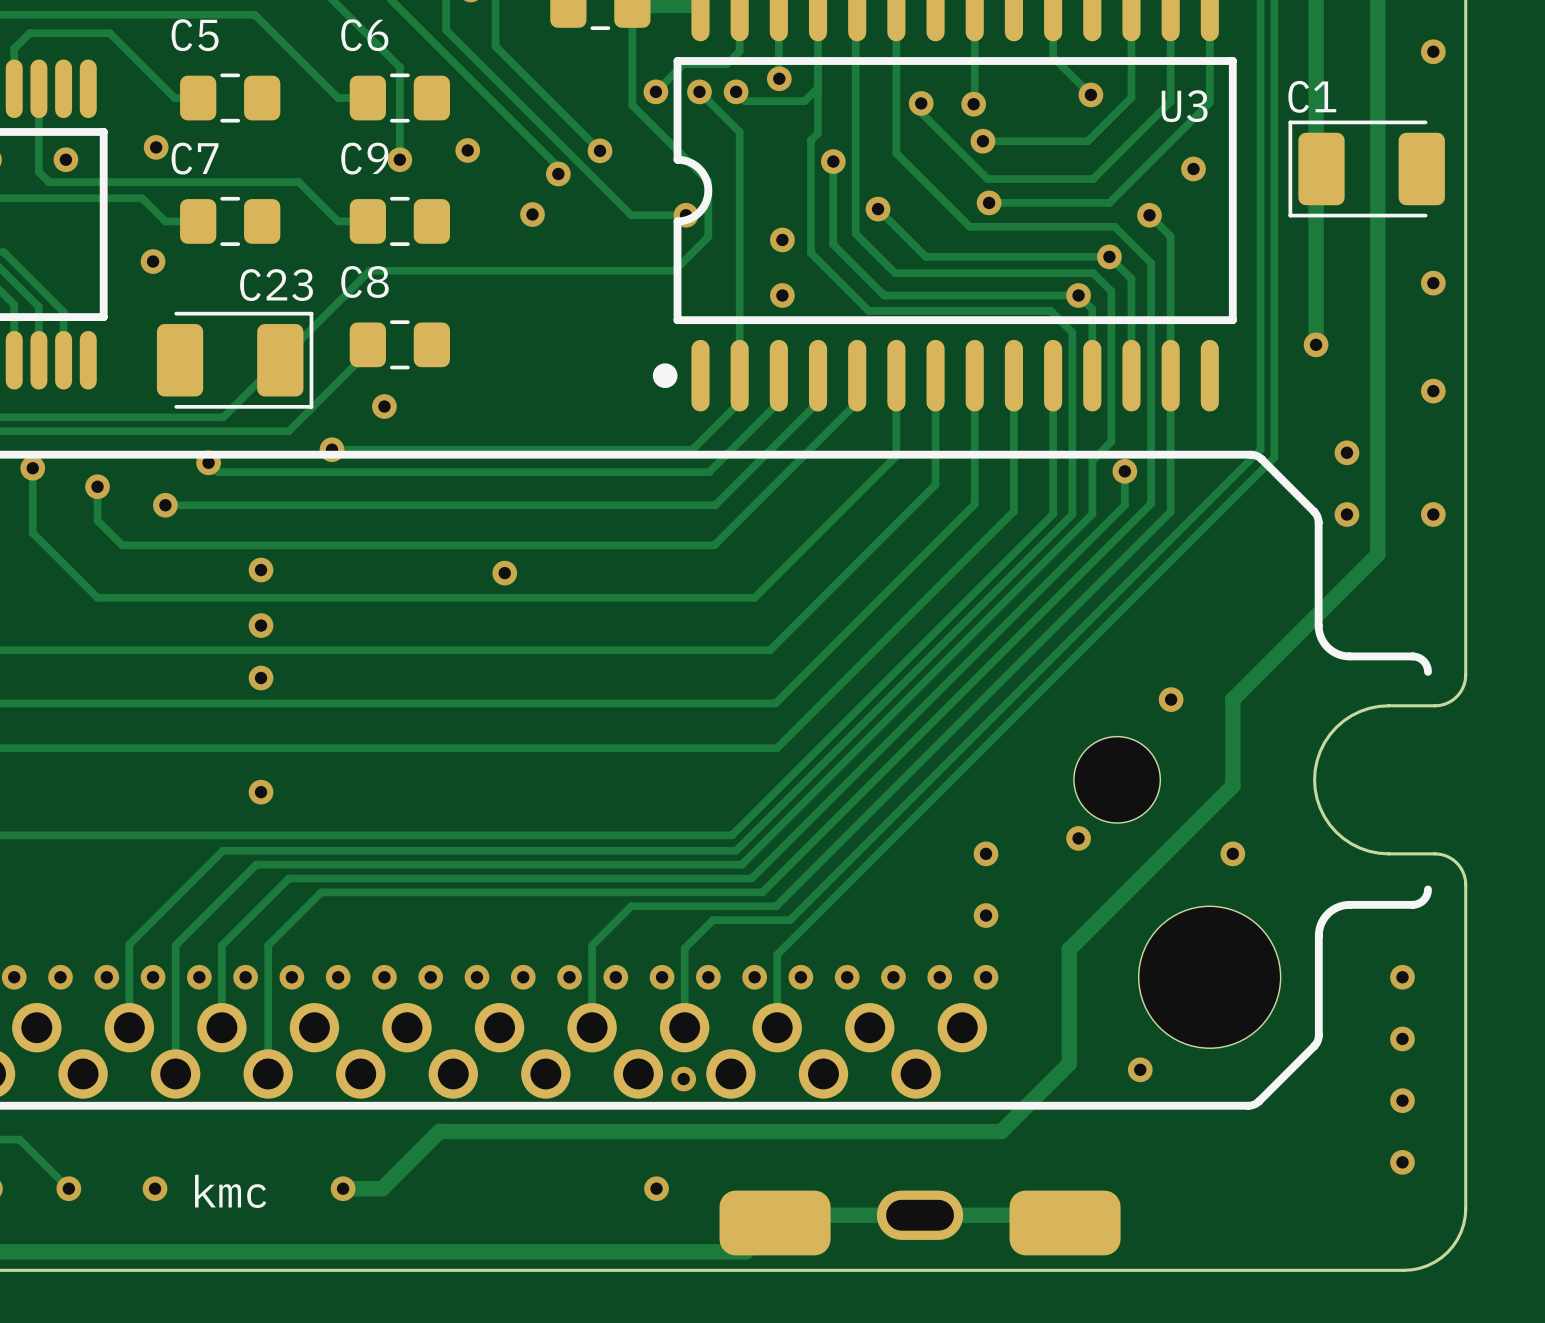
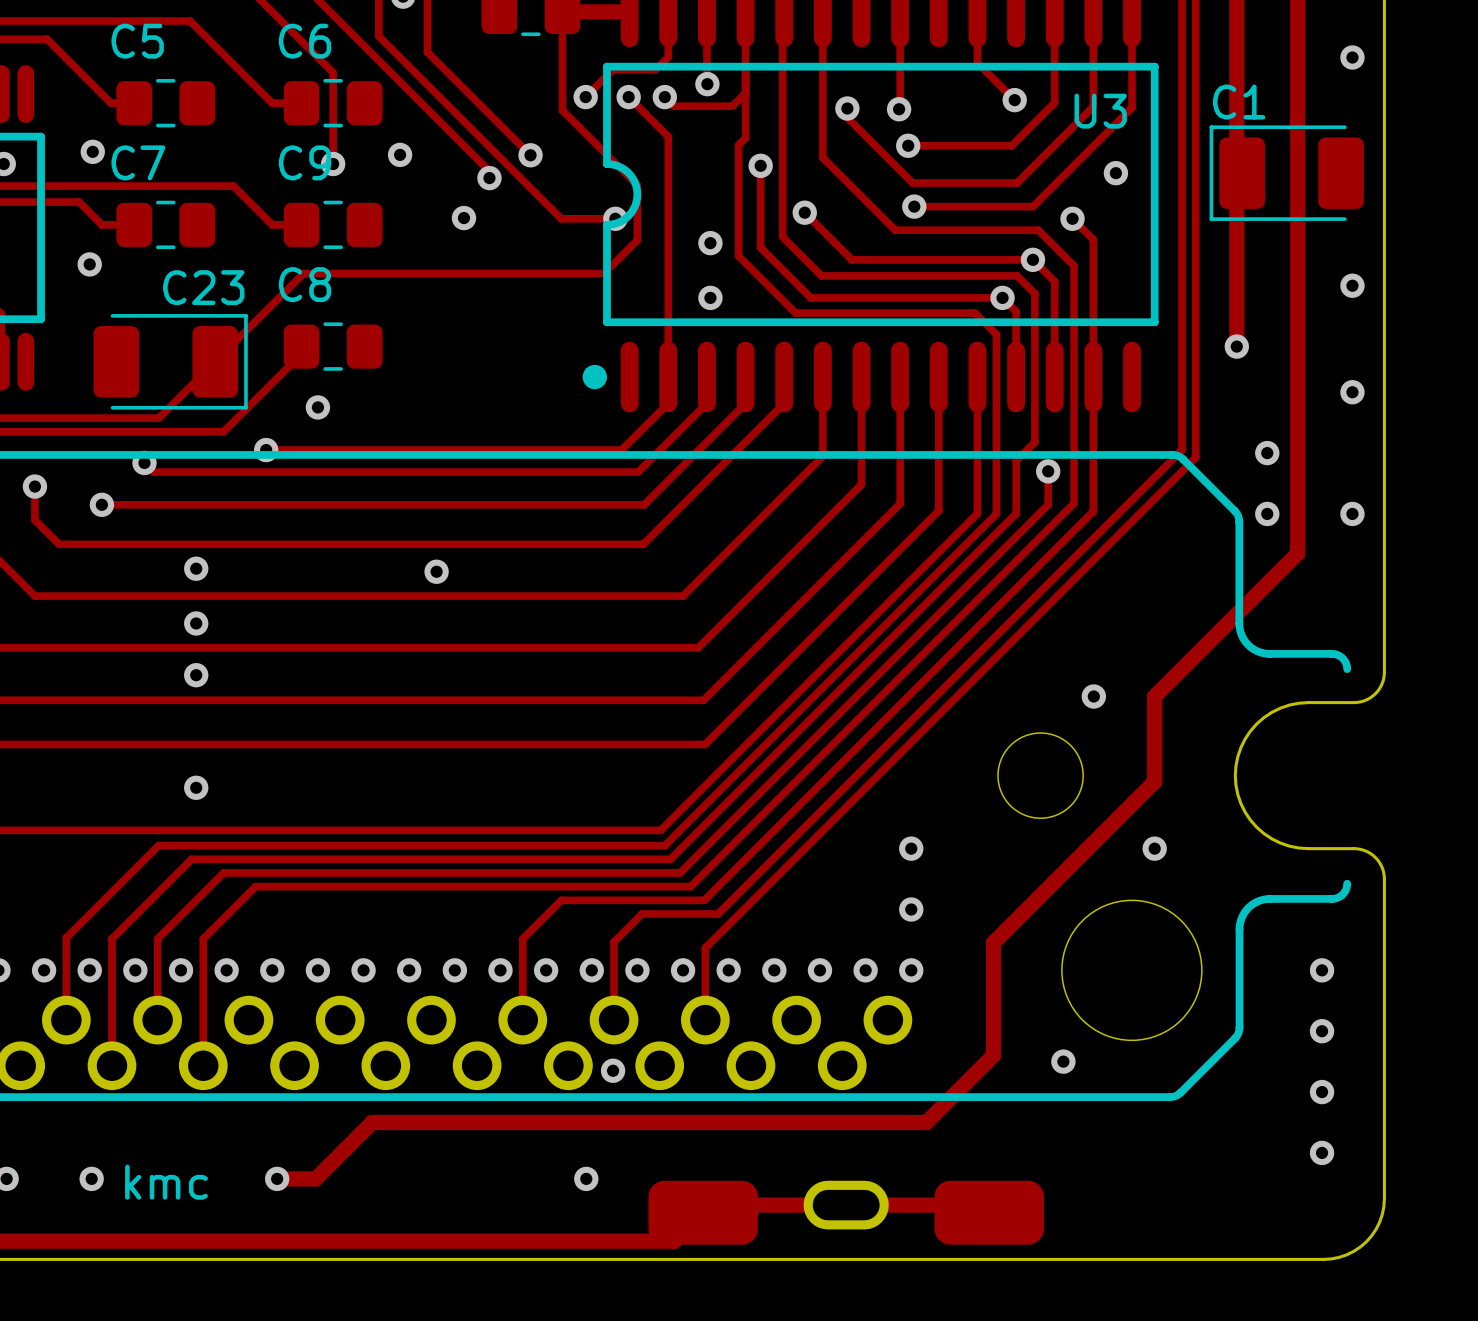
via: (1078, 838) -> none

